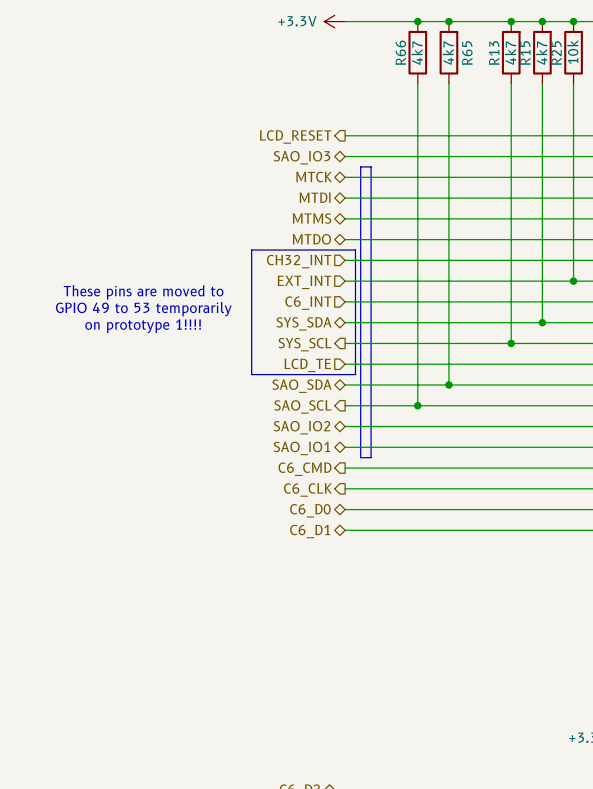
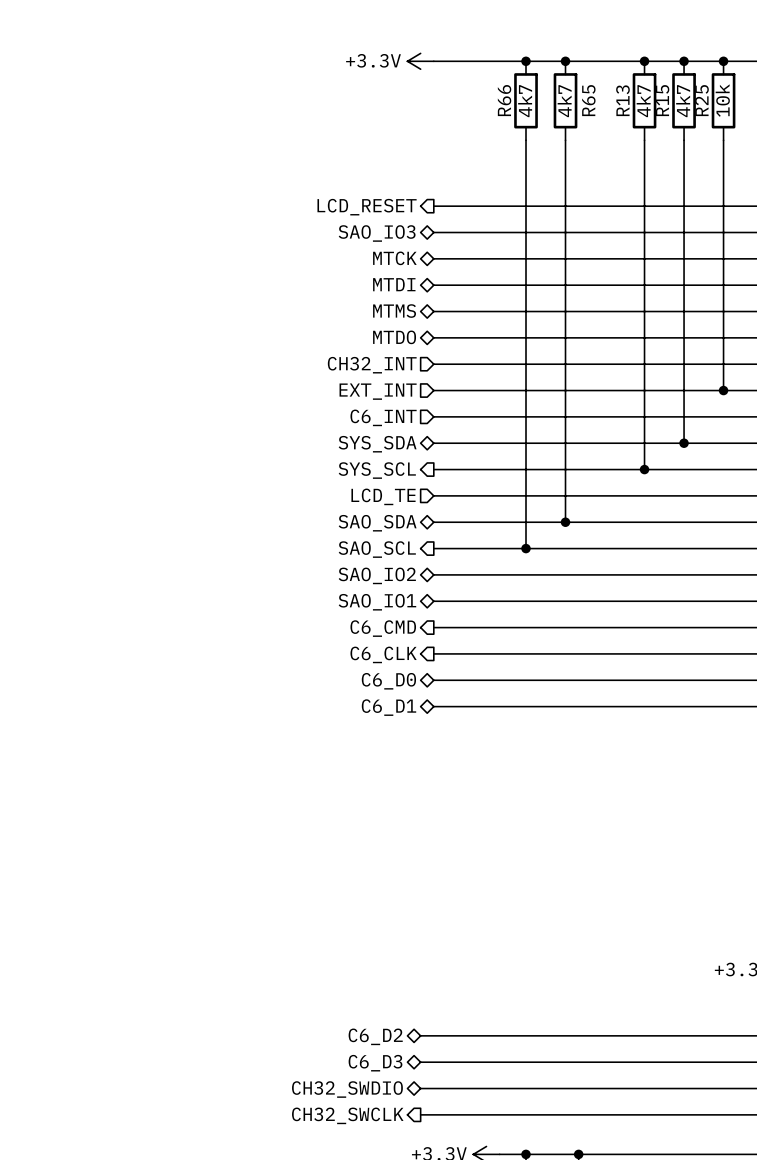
line: (360, 166) (371, 166) (371, 457) (360, 457) (360, 166) -> none
line: (251, 250) (355, 250) (355, 374) (251, 374) (251, 250) -> none
text: These pins are moved to (143, 292) -> none
text: GPIO 49 to 53 temporarily (143, 309) -> none
text: on prototype 1!!!! (143, 326) -> none

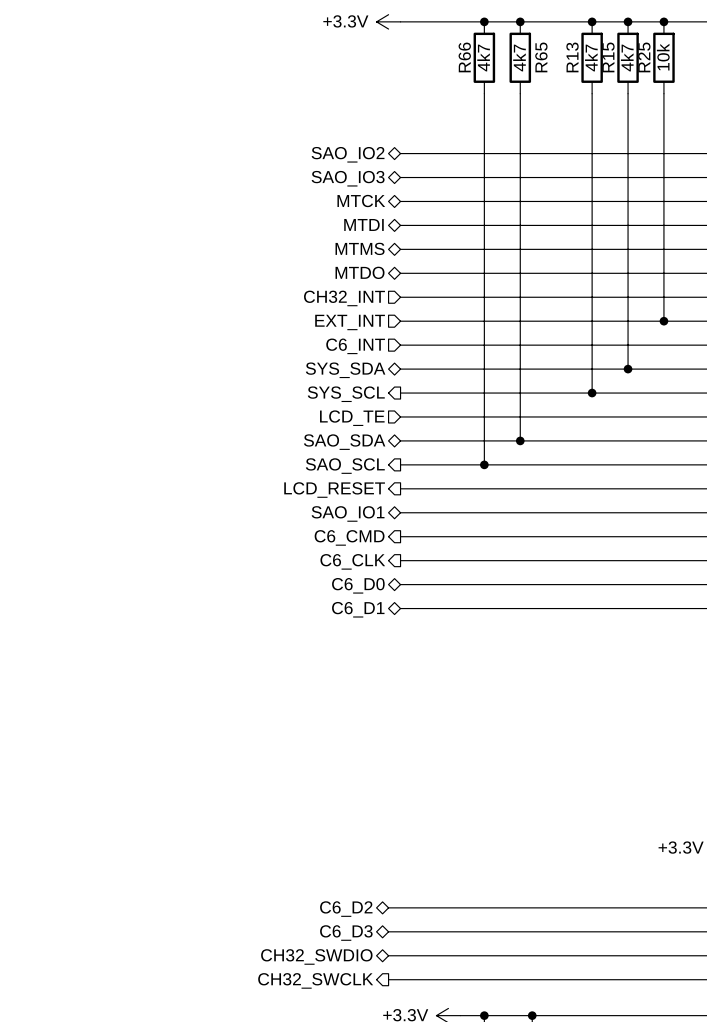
hierarchical label shape: output (367, 207) -> bidirectional (348, 154)
hierarchical label: LCD_RESET (367, 207) -> SAO_IO2 (348, 154)
hierarchical label shape: bidirectional (377, 575) -> output (334, 490)
hierarchical label: SAO_IO2 (377, 575) -> LCD_RESET (334, 490)

